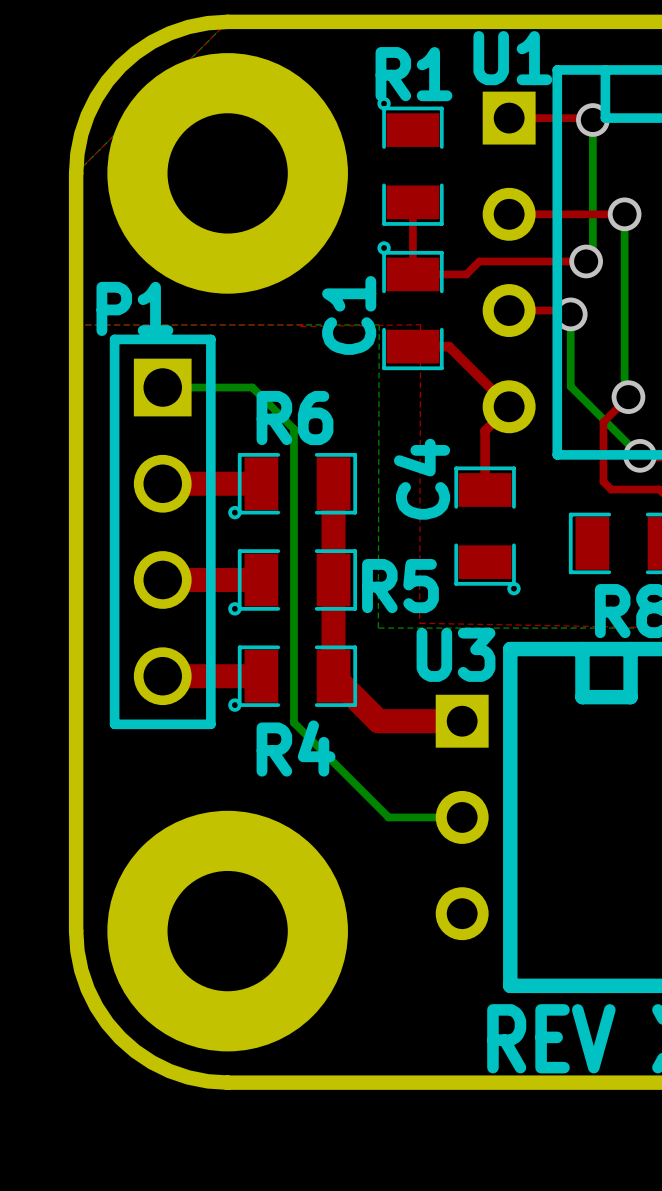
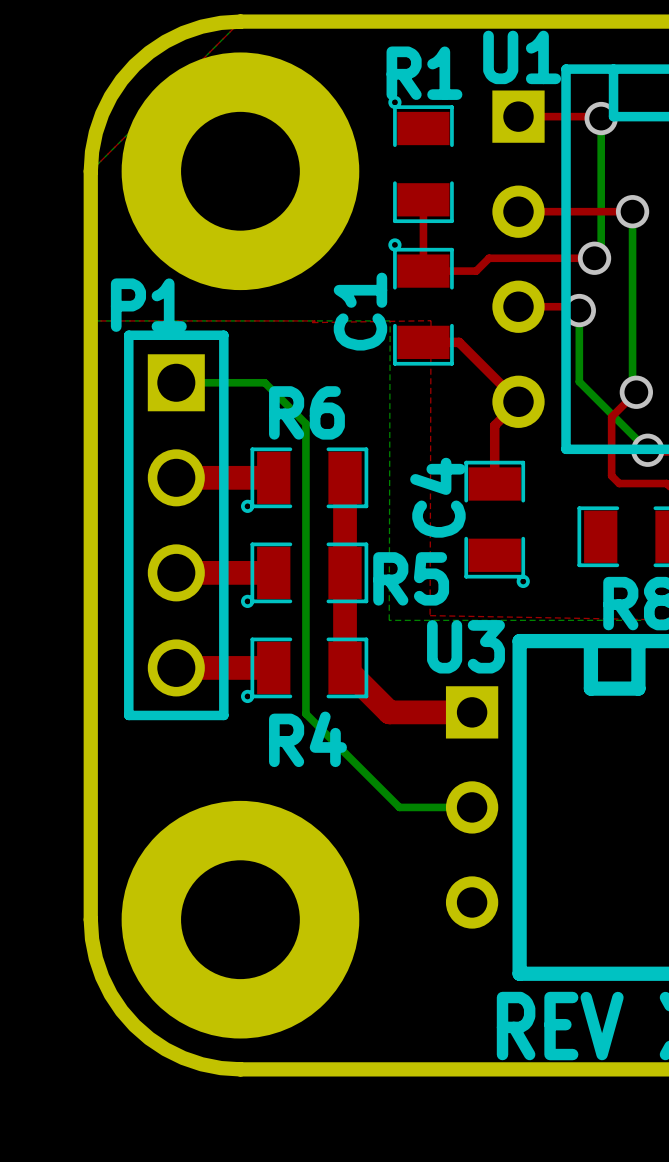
C4 name position: C4 (422, 479) -> C4 (437, 497)

